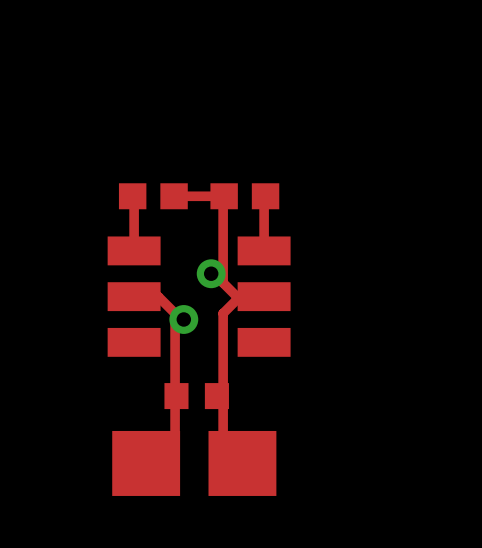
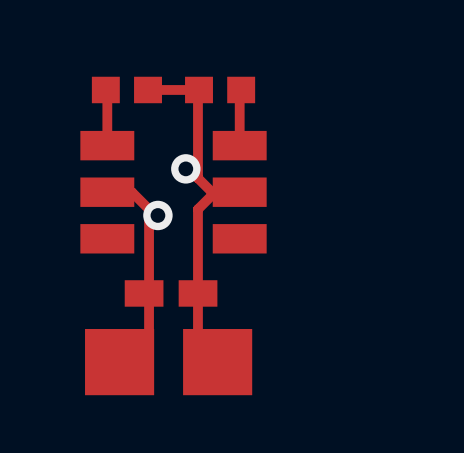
part footprint: [164, 383, 229, 410] -> [124, 280, 218, 307]

